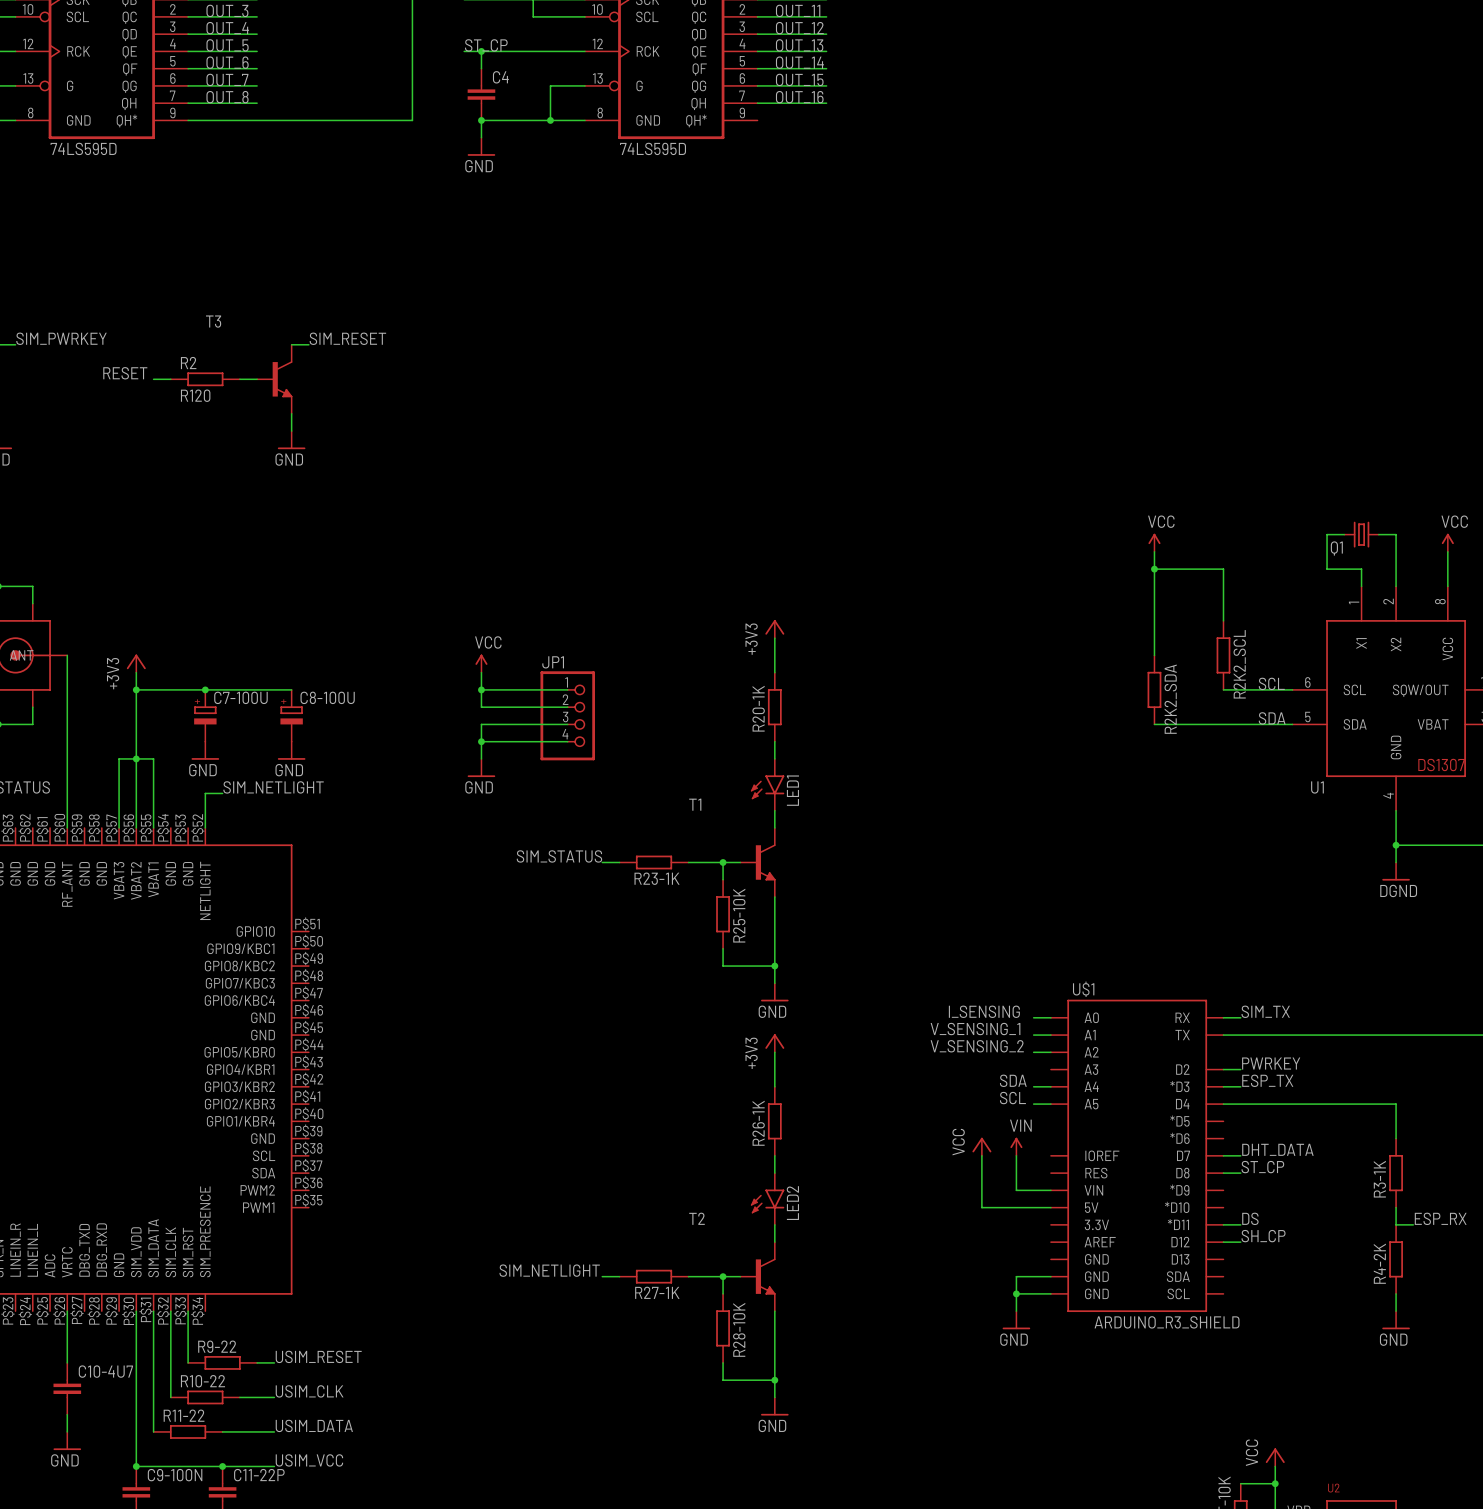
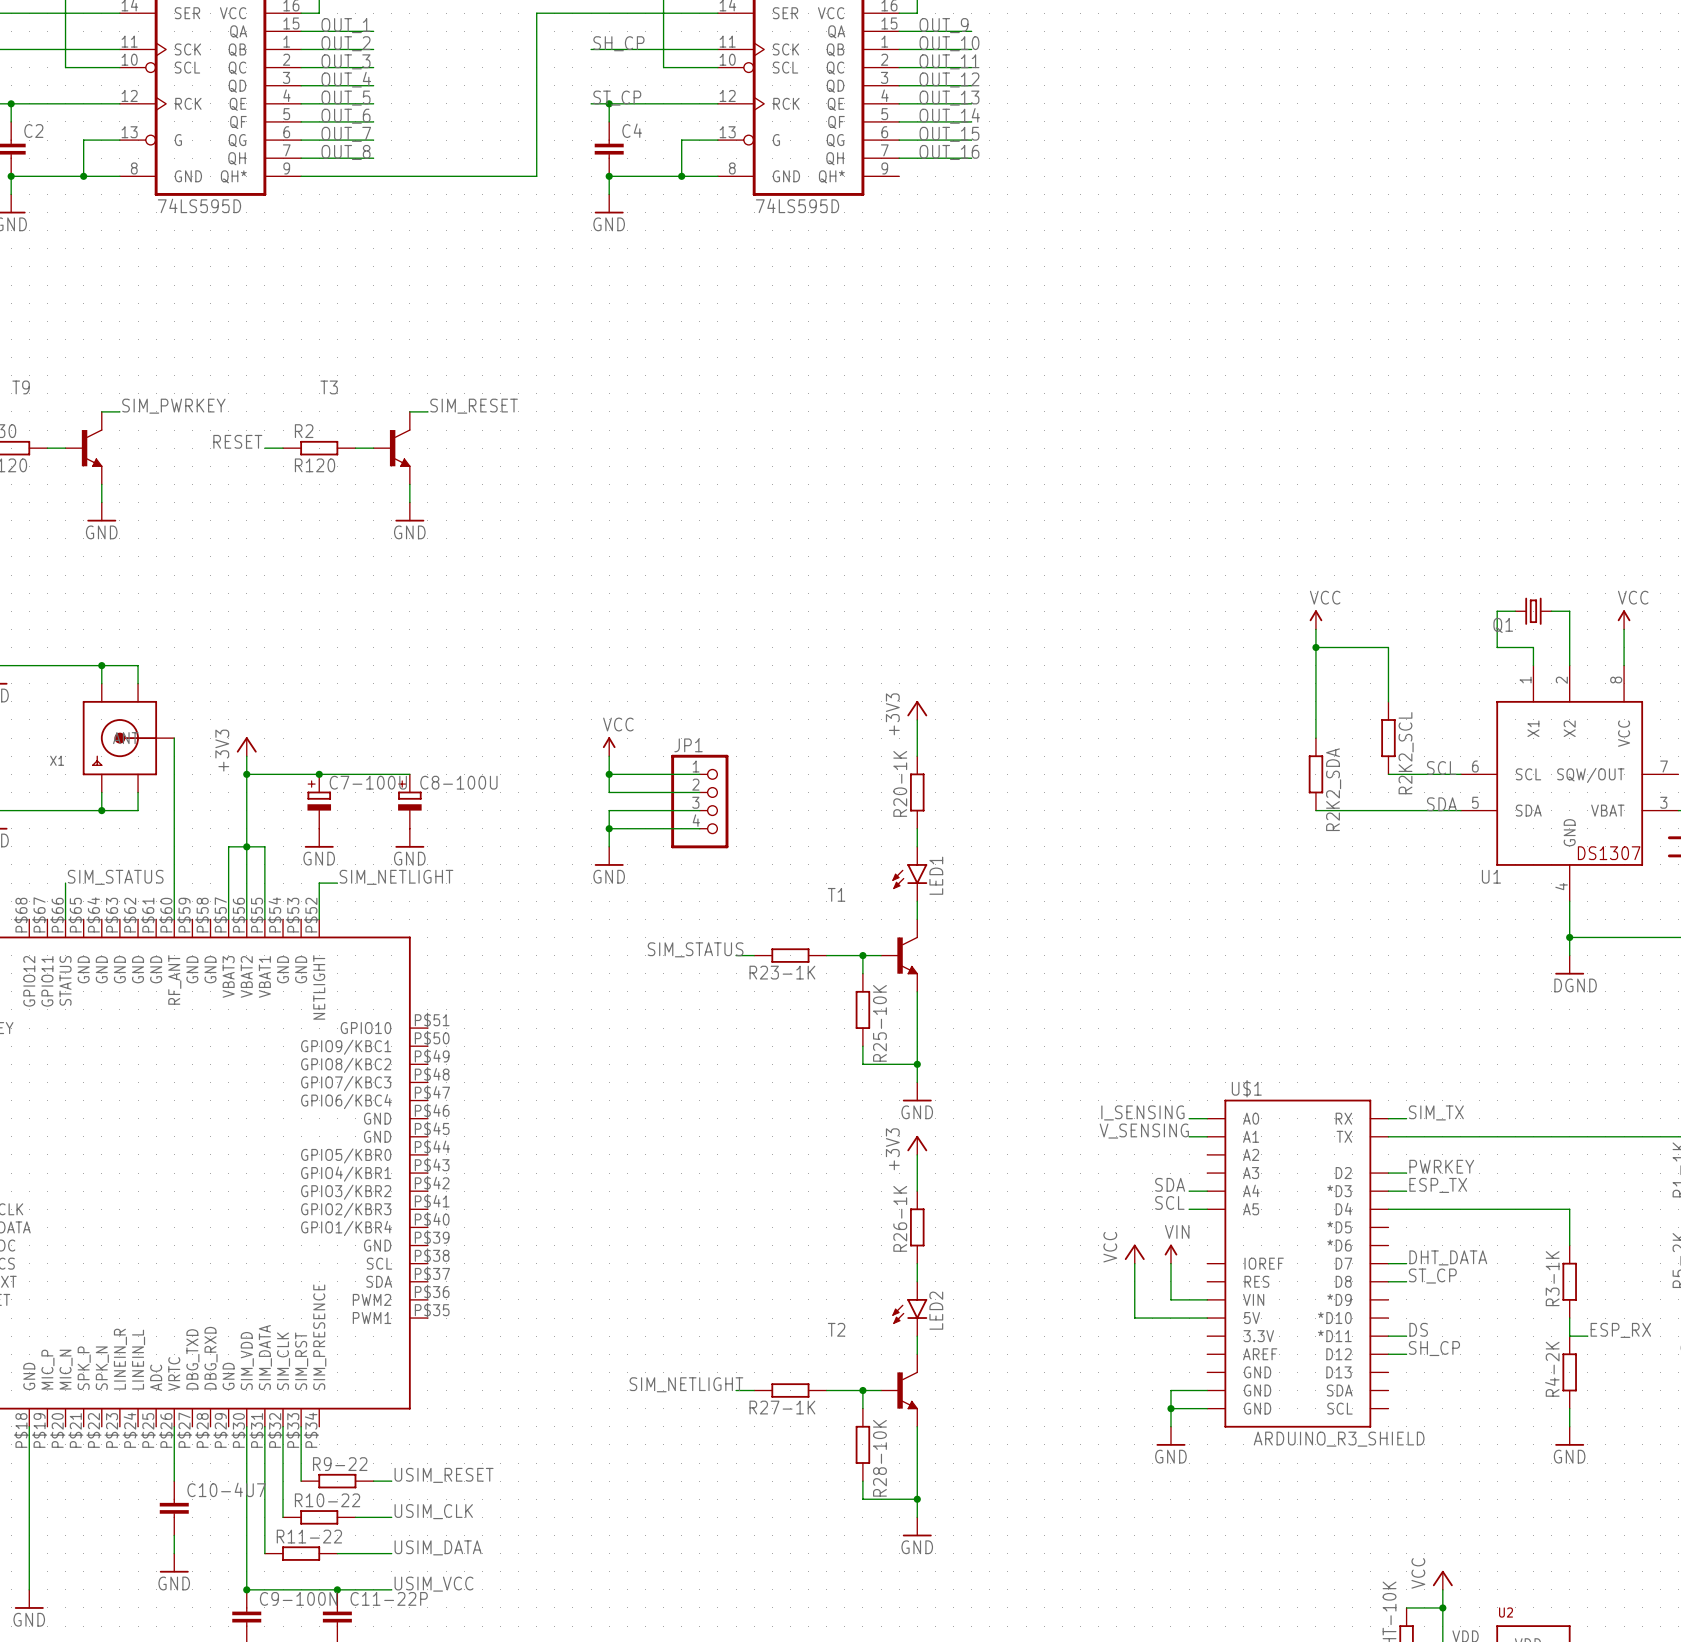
label: V_SENSING_1 (975, 1029) -> none
label: none -> V_SENSING (1144, 1131)
label: V_SENSING_2 (977, 1046) -> none
wire: (1033, 1052) (1050, 1052) -> none

